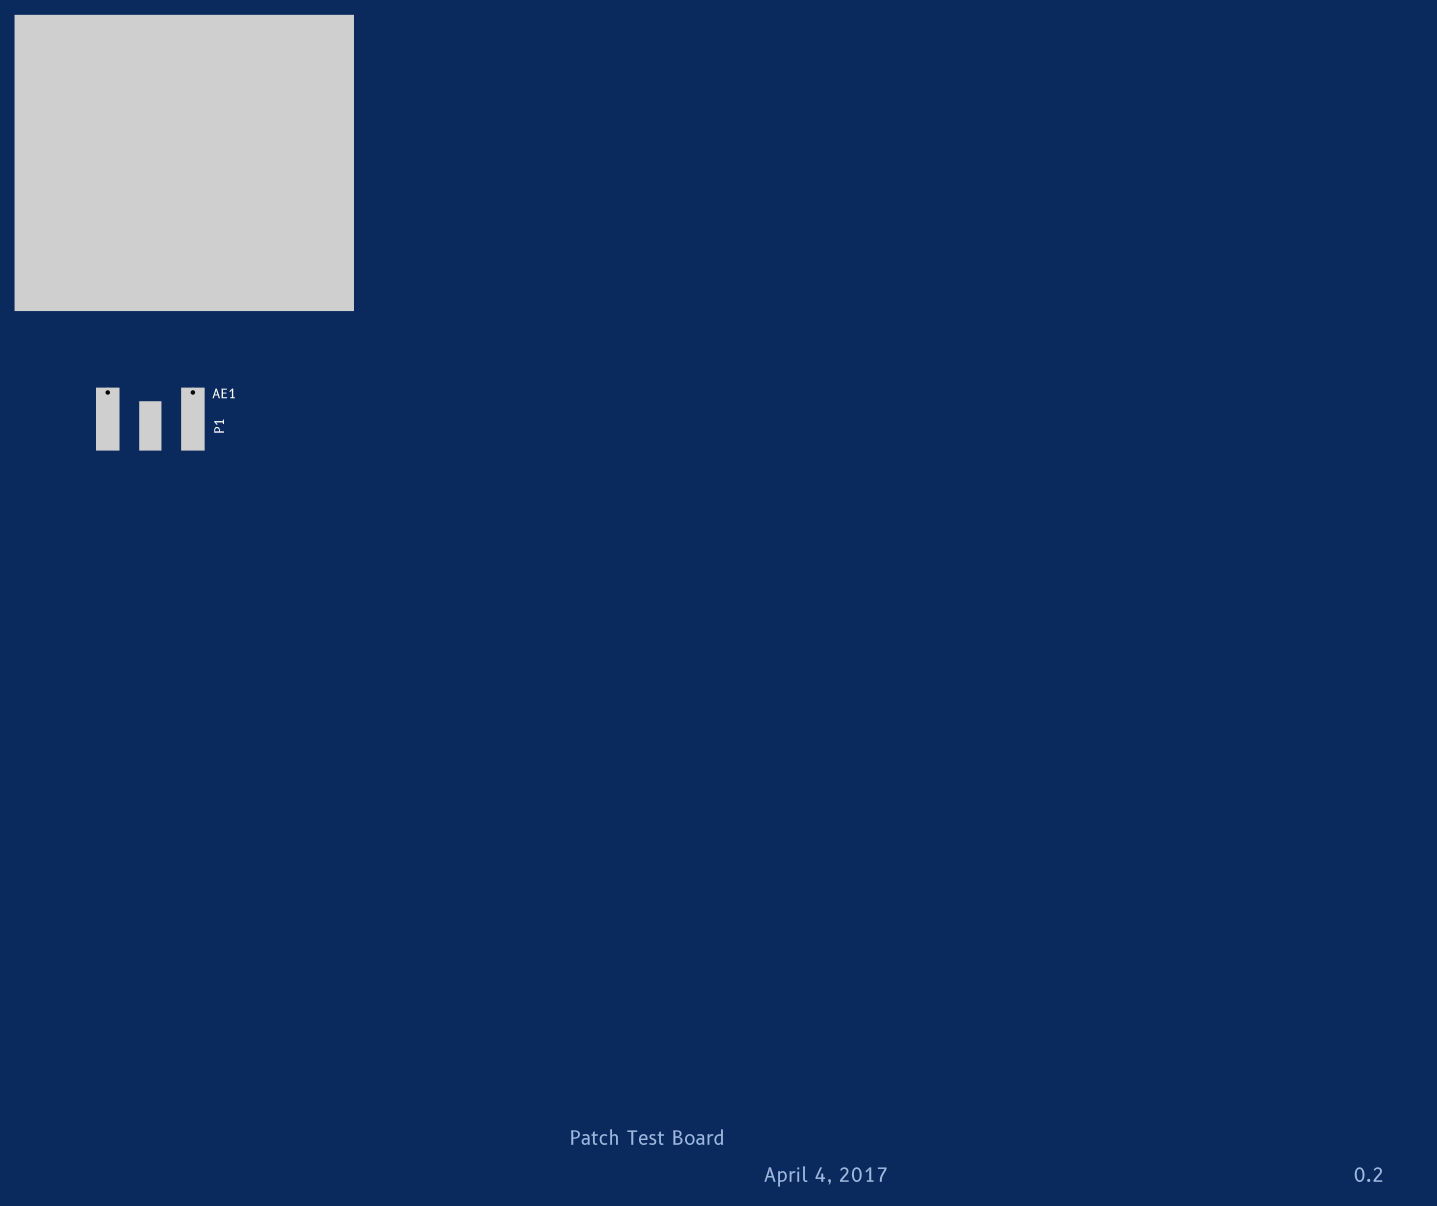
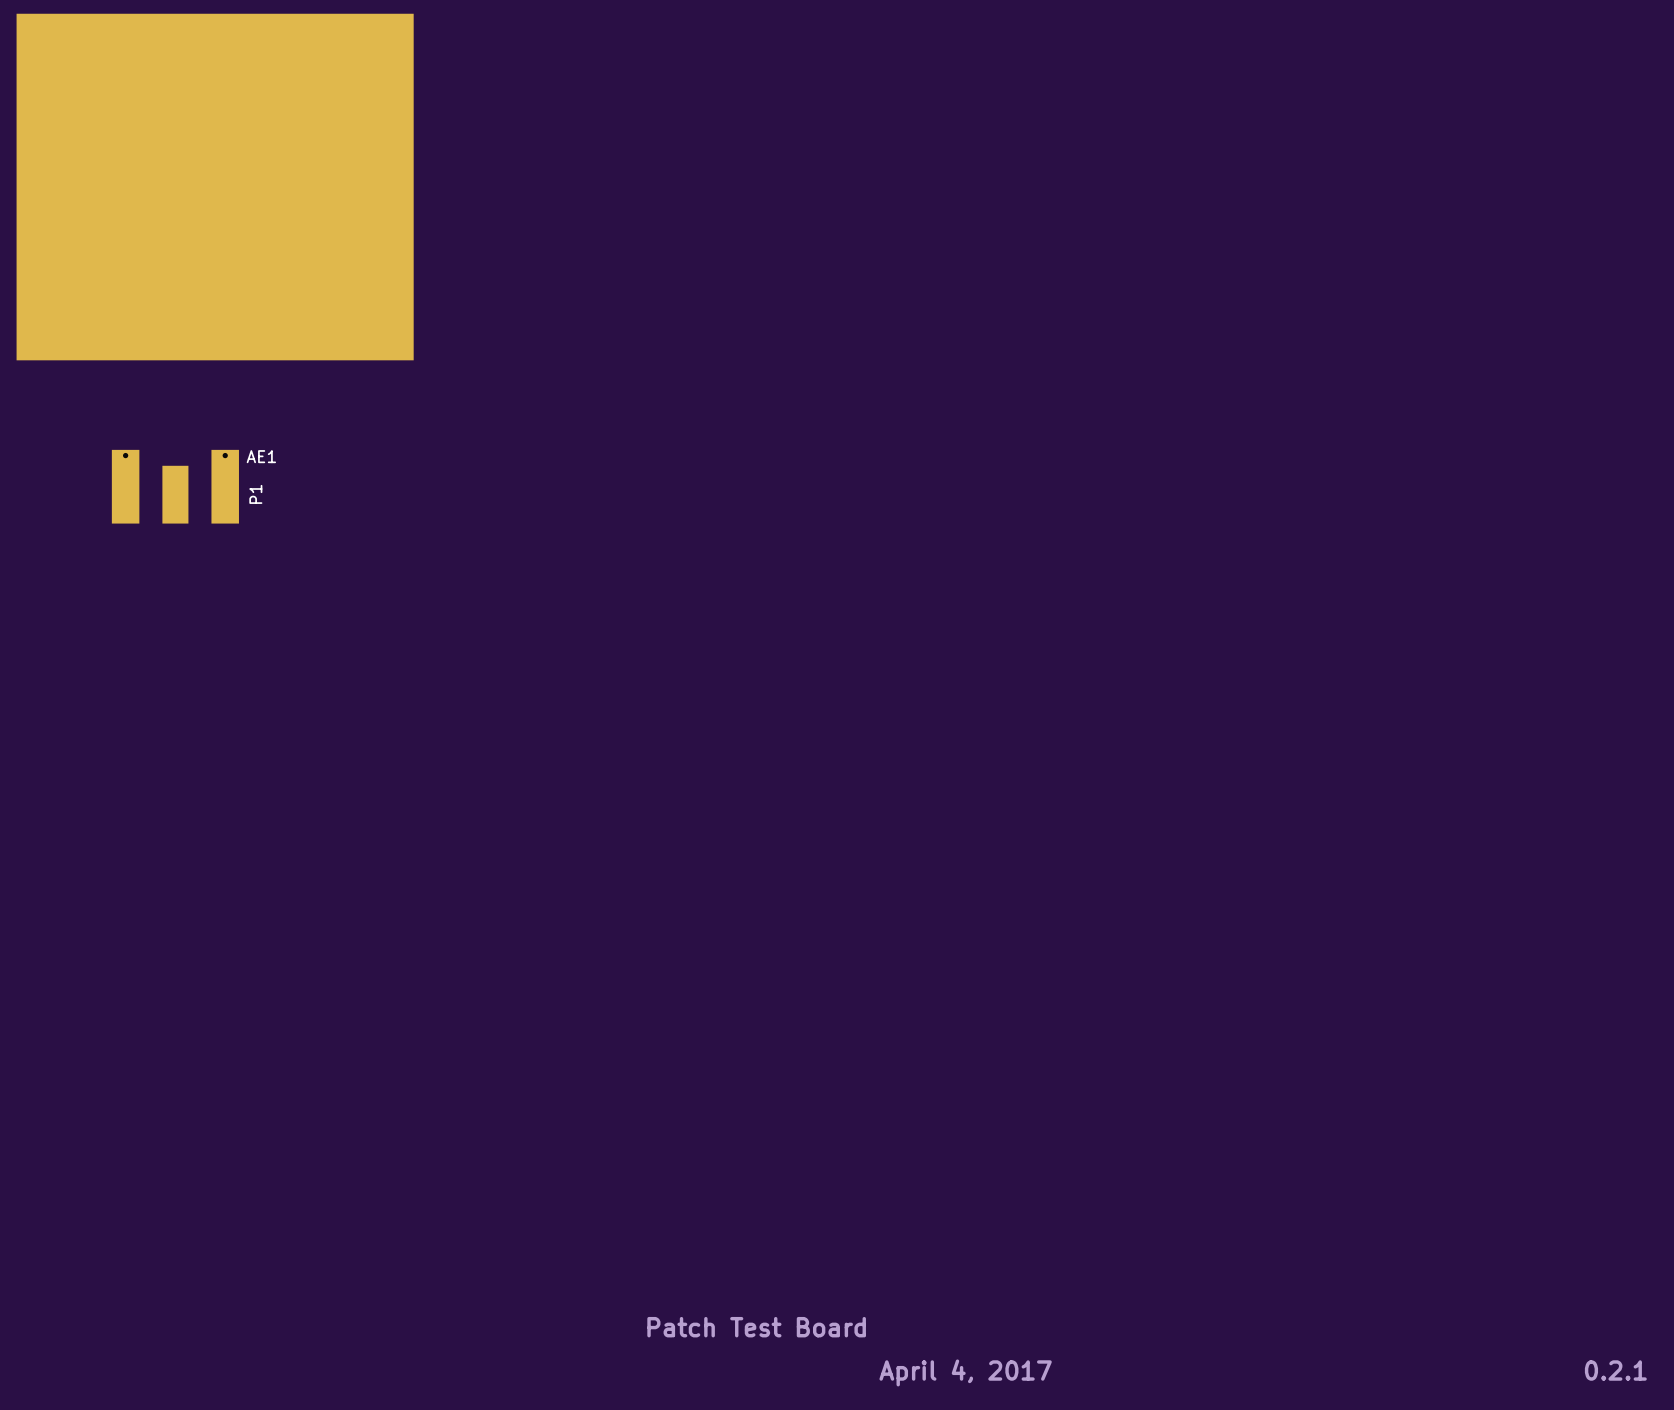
text: 0.2 (1368, 1174) -> 0.2.1 (1615, 1370)

